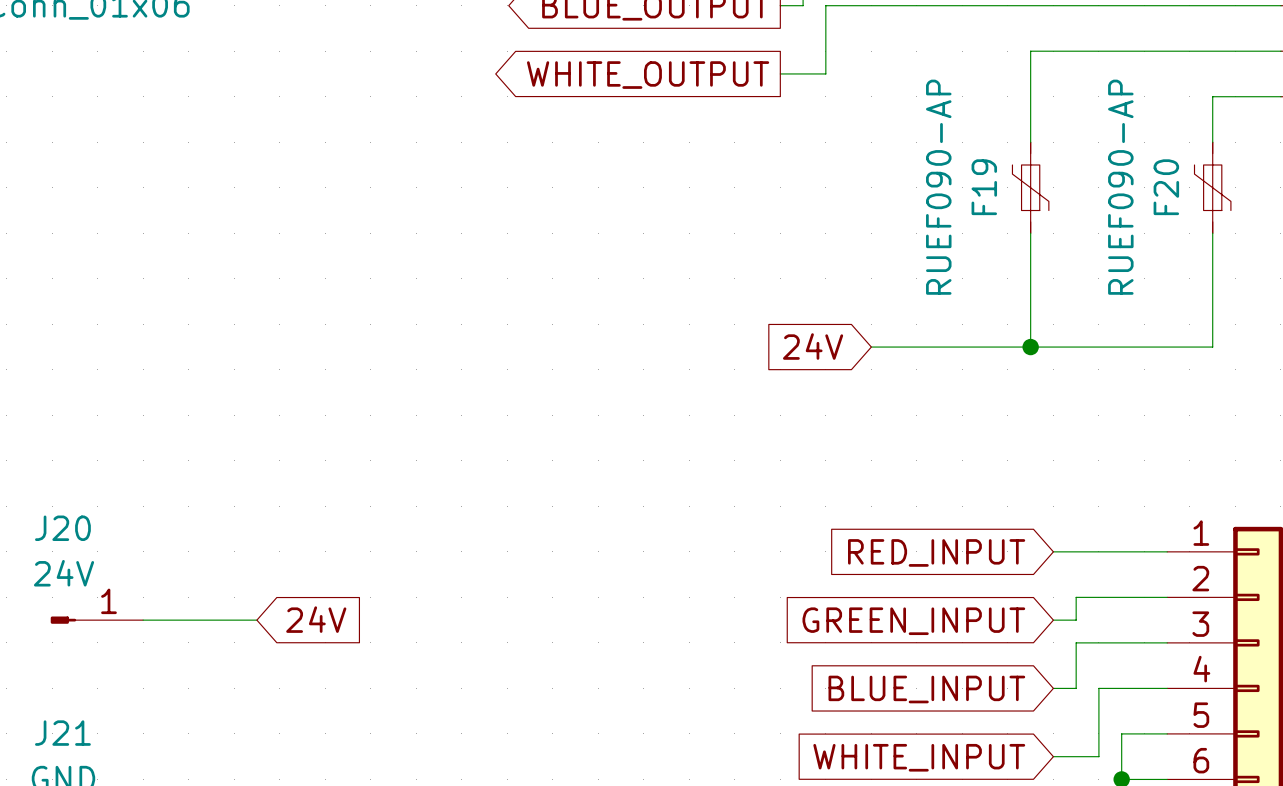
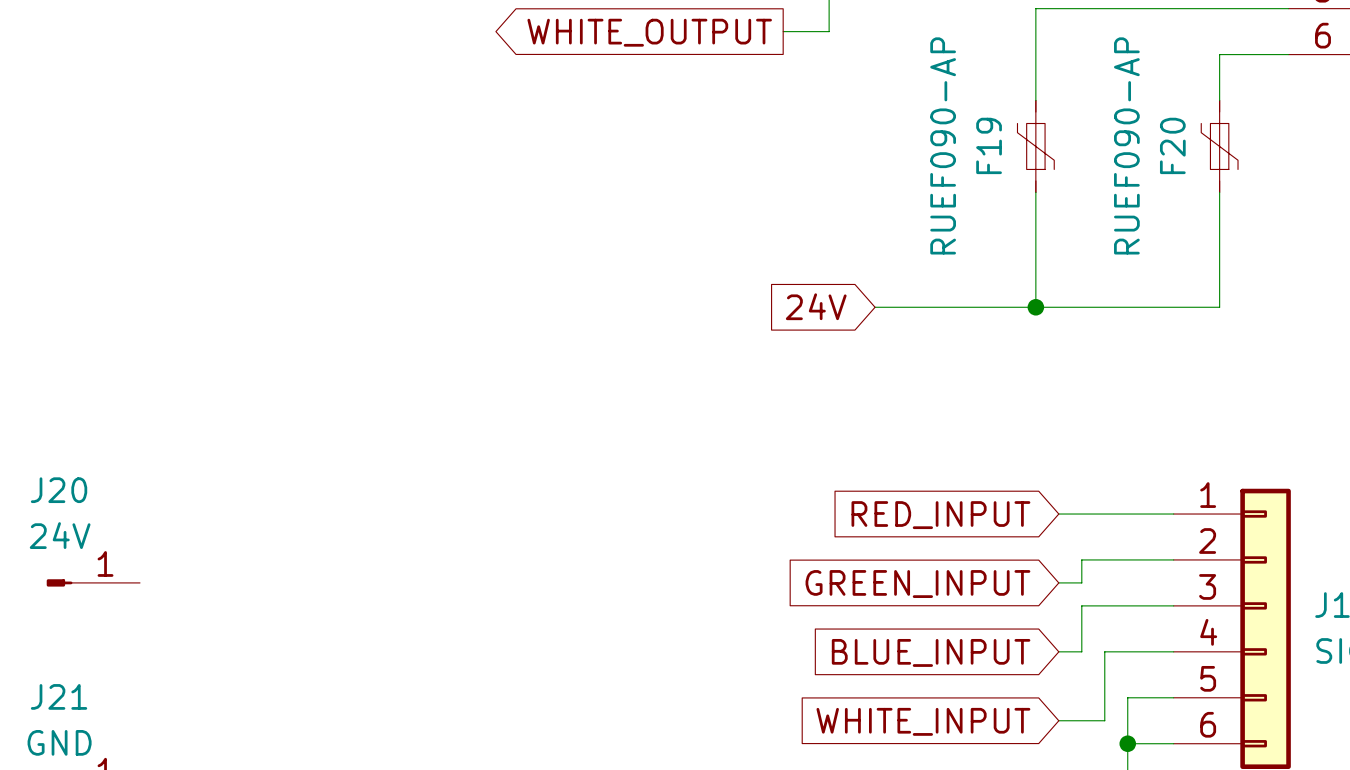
global label: 24V (316, 619) -> none
wire: (143, 620) (256, 620) -> none

